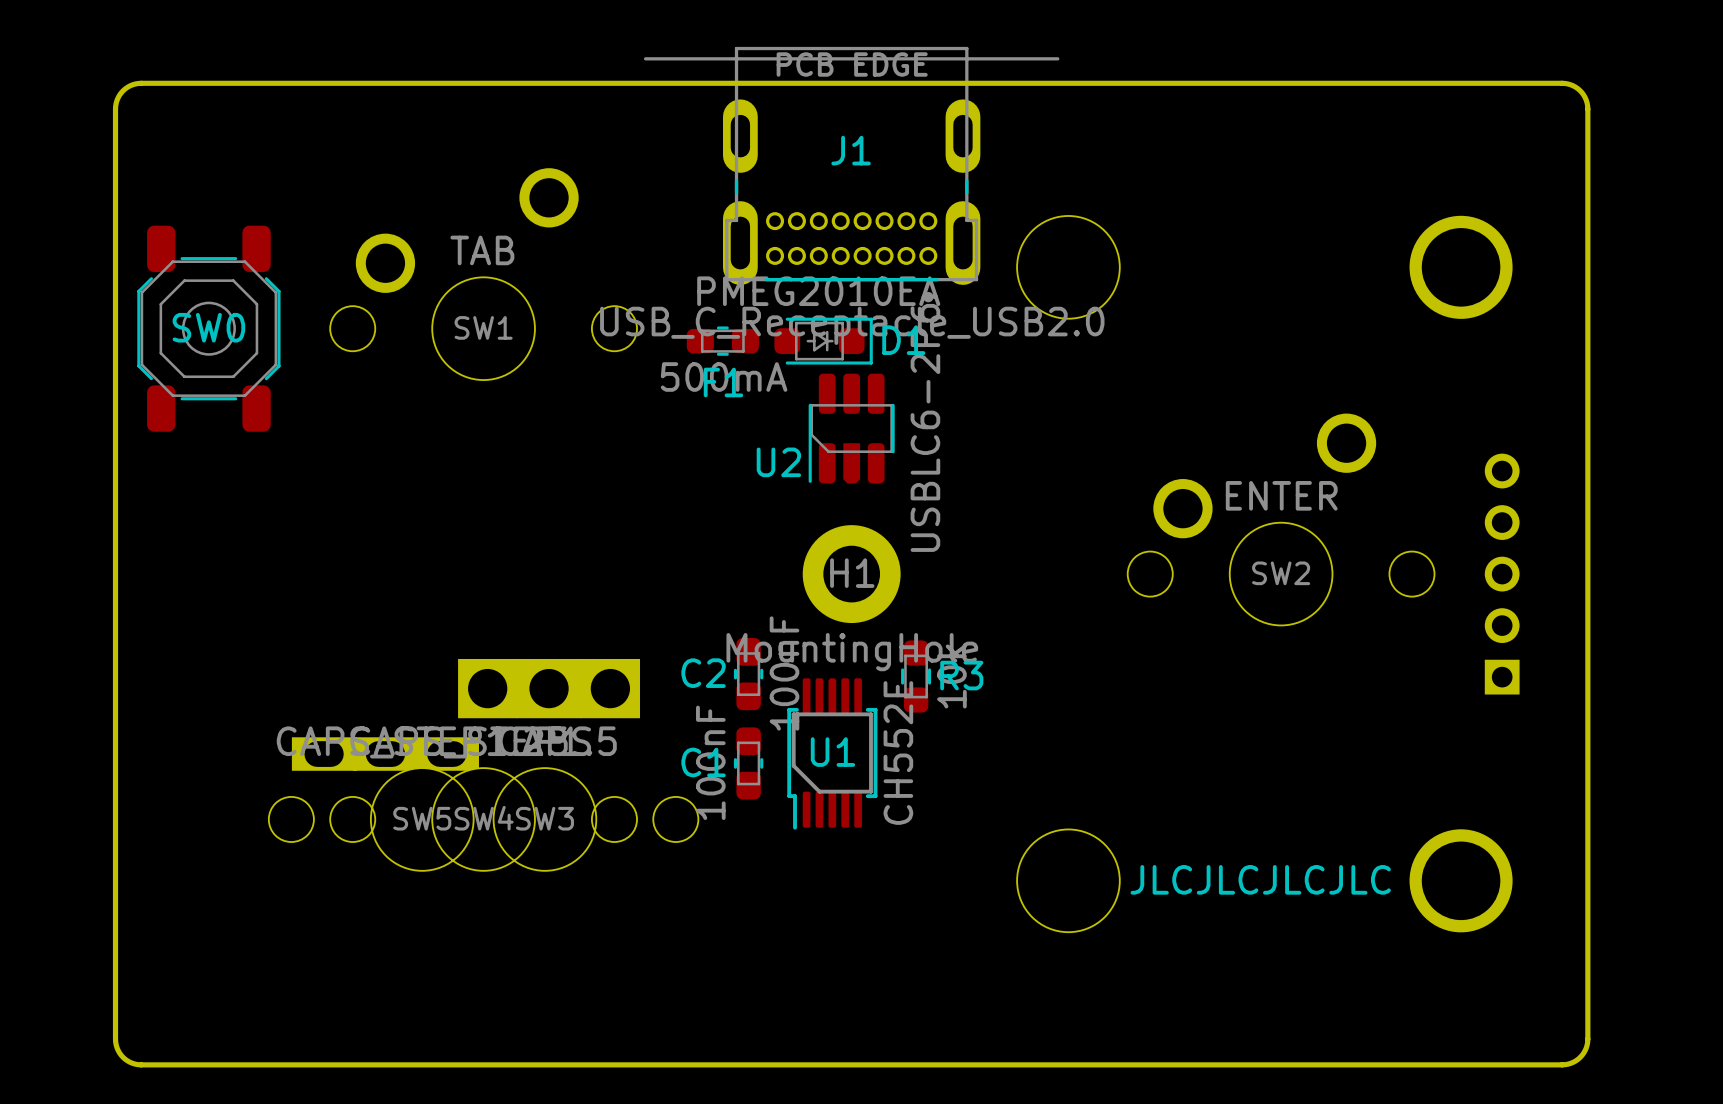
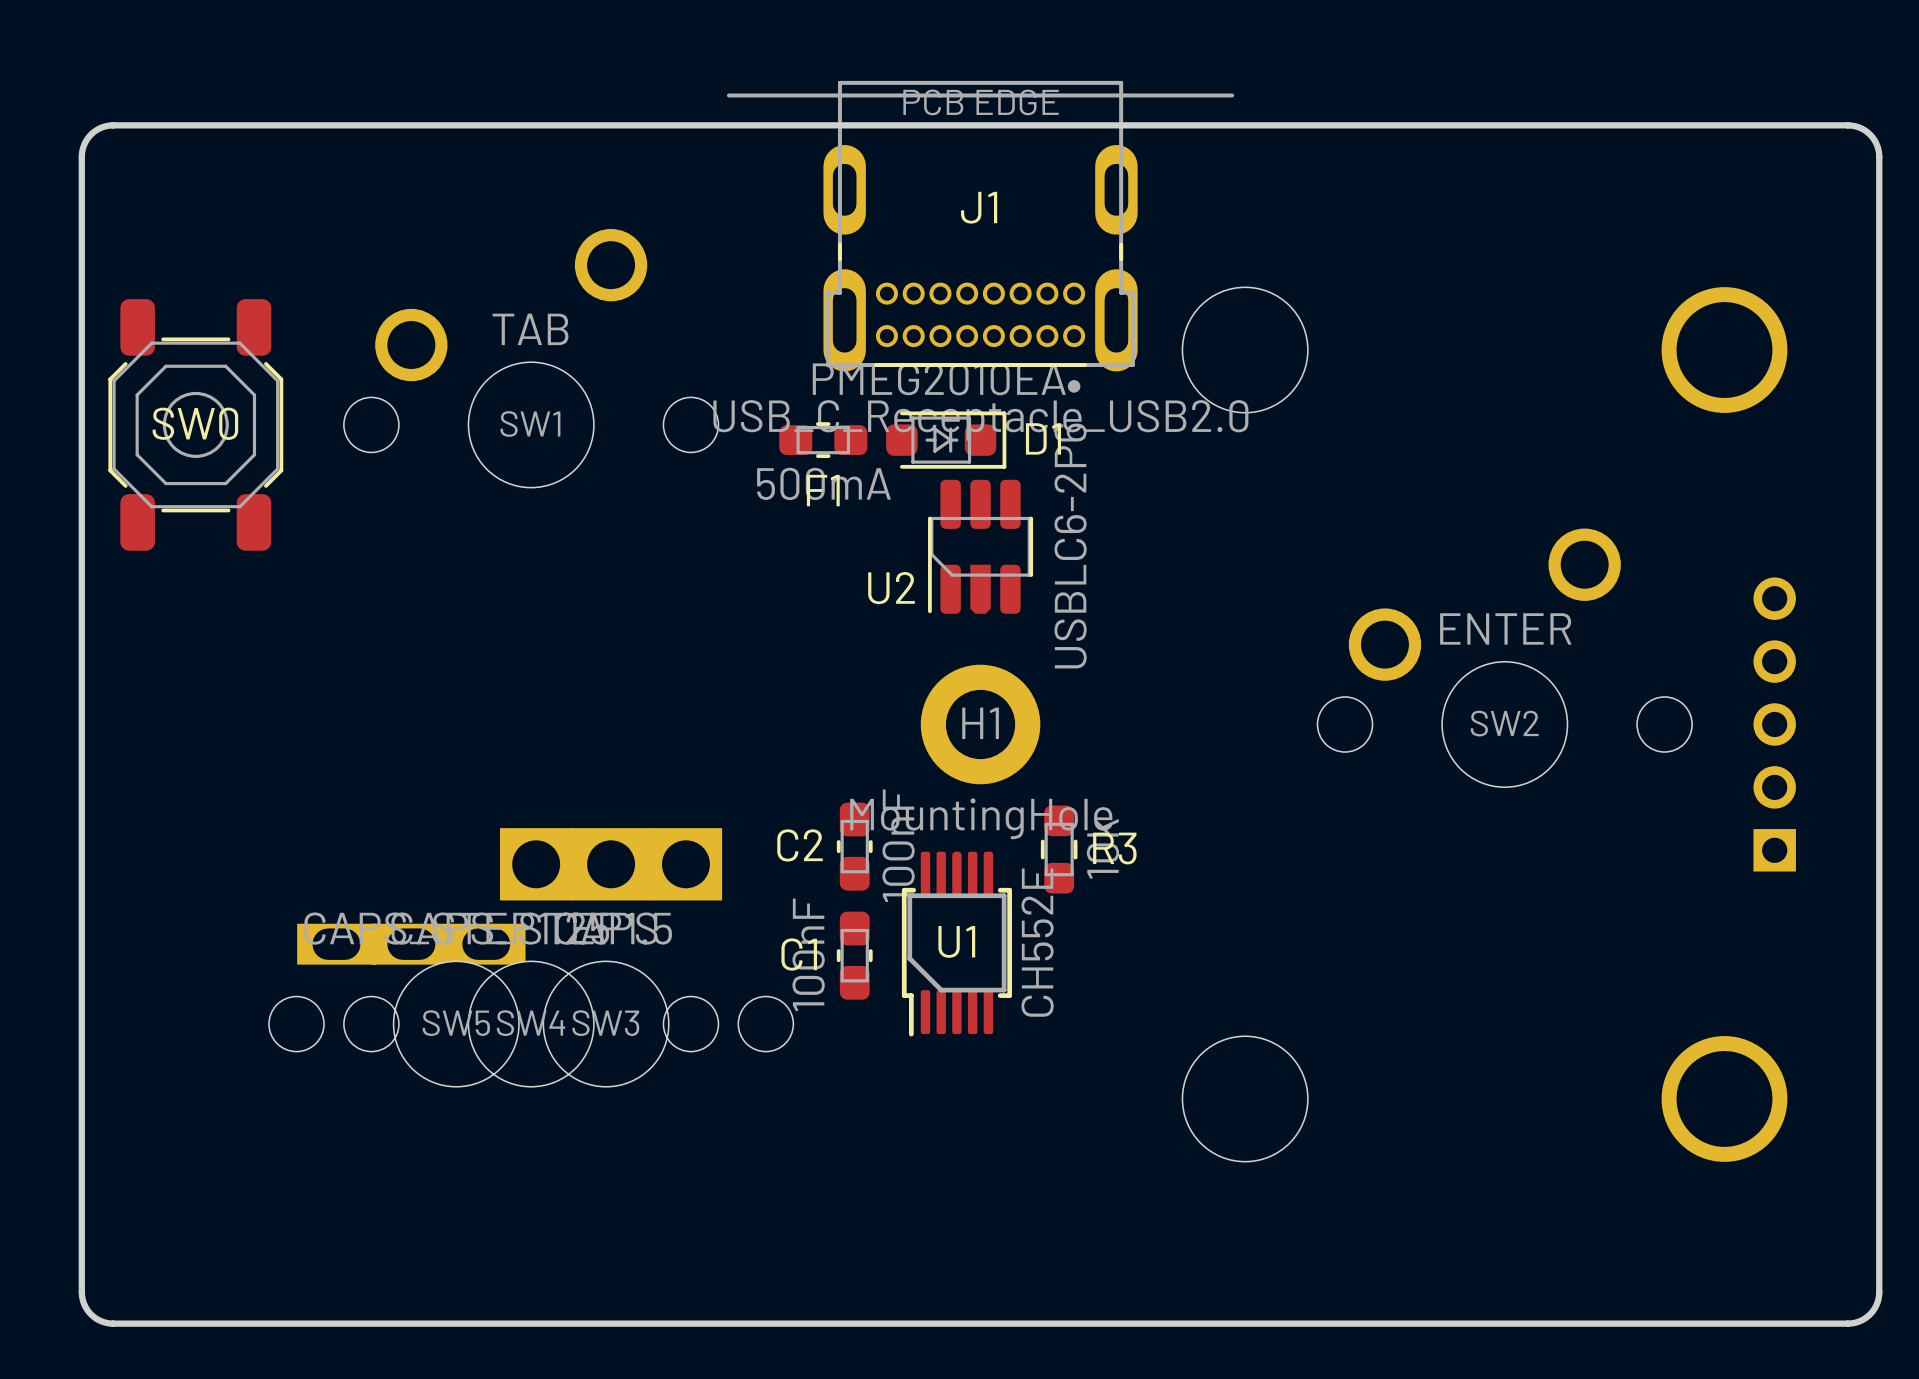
text: JLCJLCJLCJLC (1260, 879) -> none

